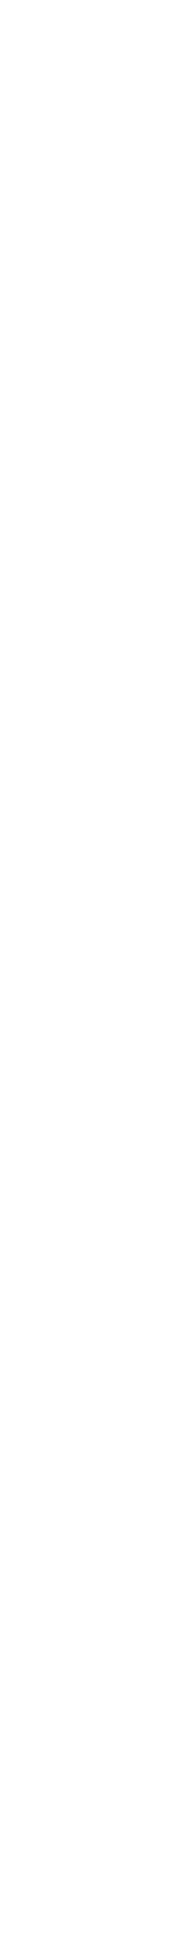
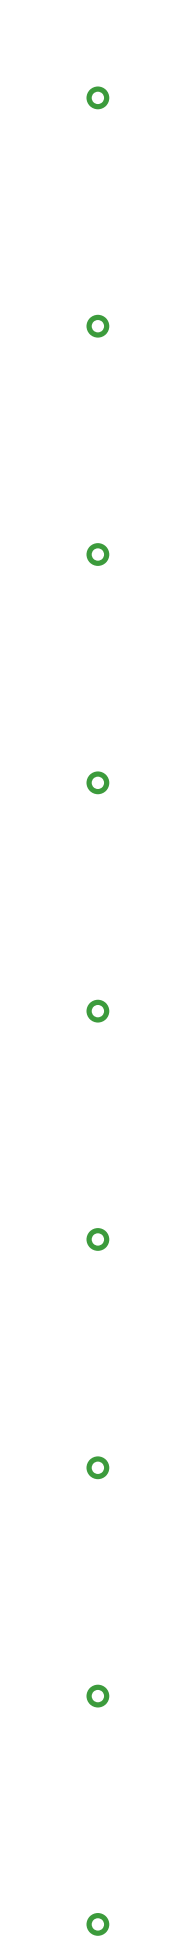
part: none -> (97, 97)
part: none -> (97, 326)
part: none -> (97, 554)
part: none -> (97, 782)
part: none -> (97, 1011)
part: none -> (97, 1239)
part: none -> (97, 1467)
part: none -> (97, 1696)
part: none -> (97, 1924)

